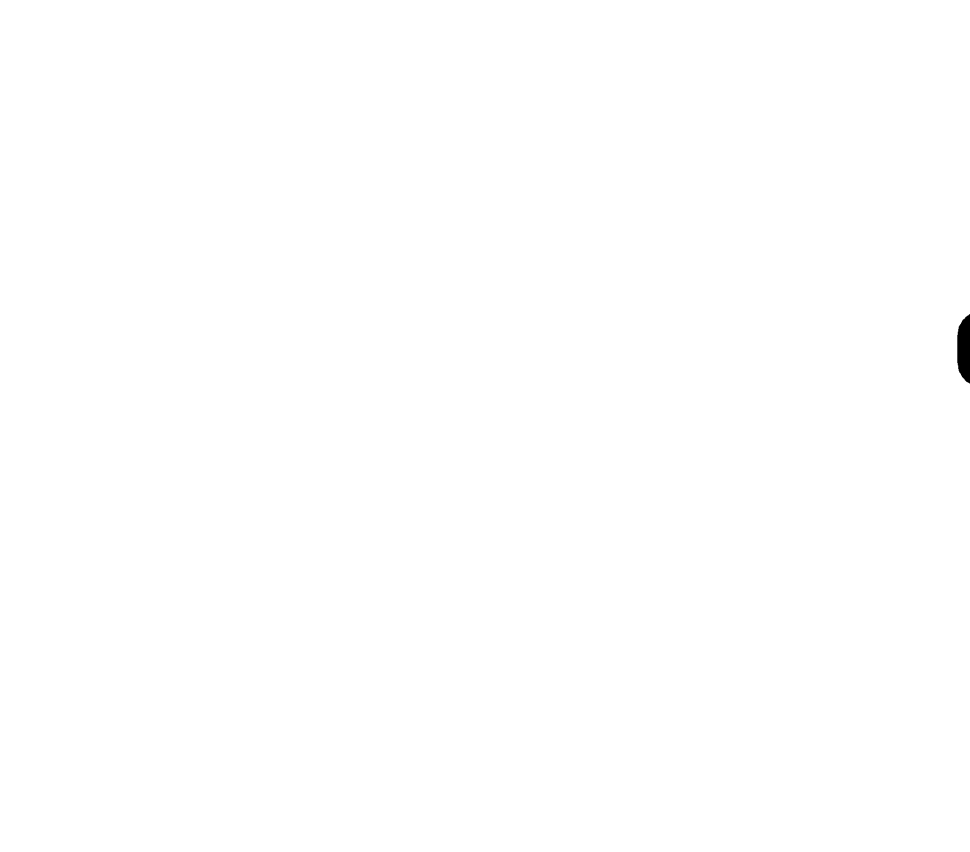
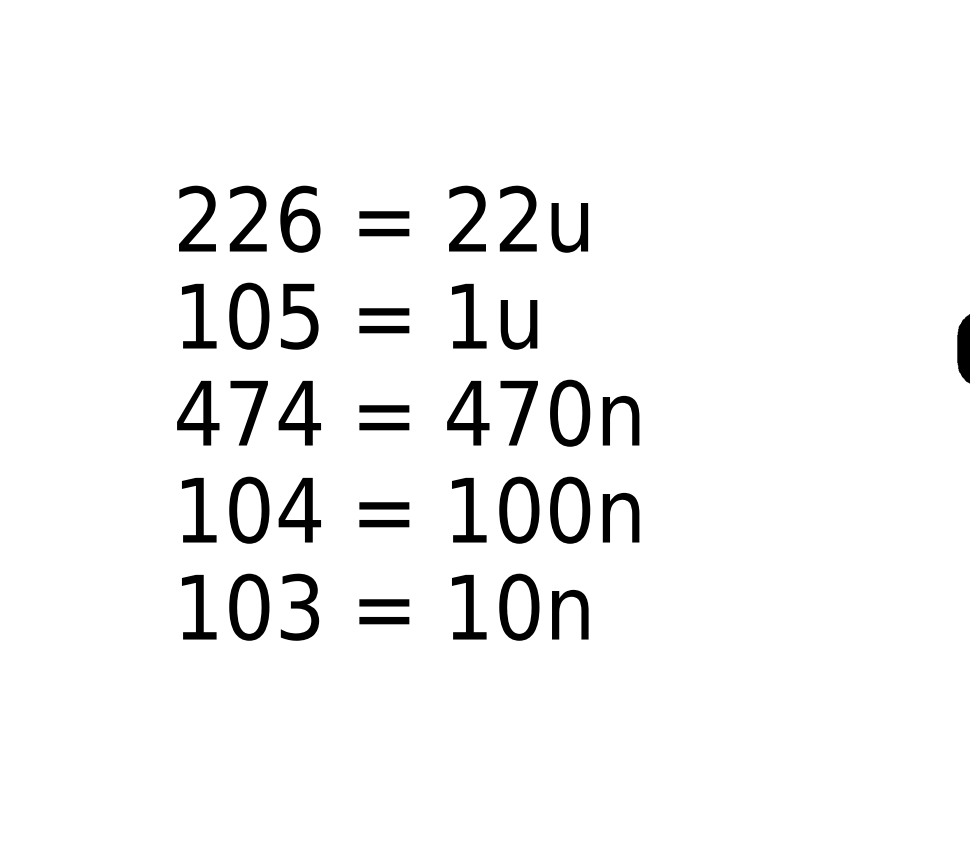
text: none -> 226 = 22u (383, 219)
text: none -> 105 = 1u (359, 316)
text: none -> 474 = 470n (408, 413)
text: none -> 104 = 100n (410, 510)
text: none -> 103 = 10n (385, 607)

